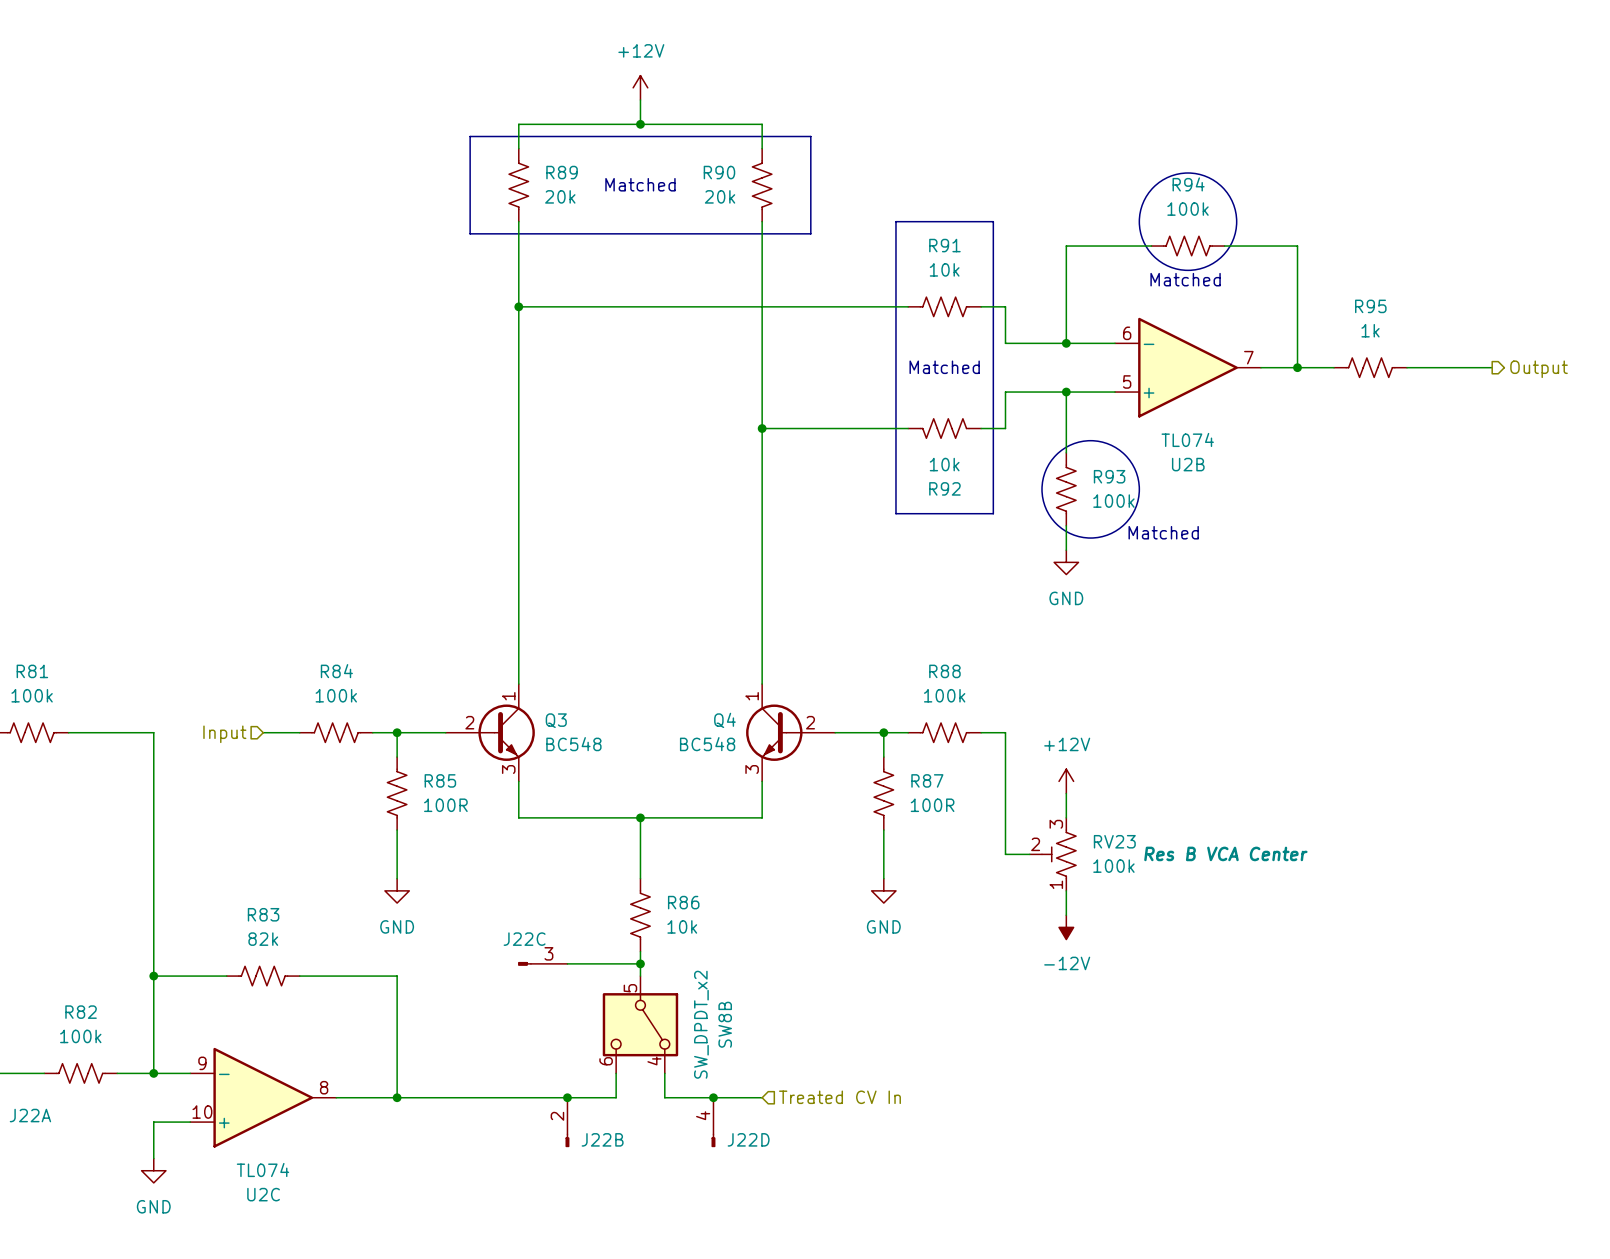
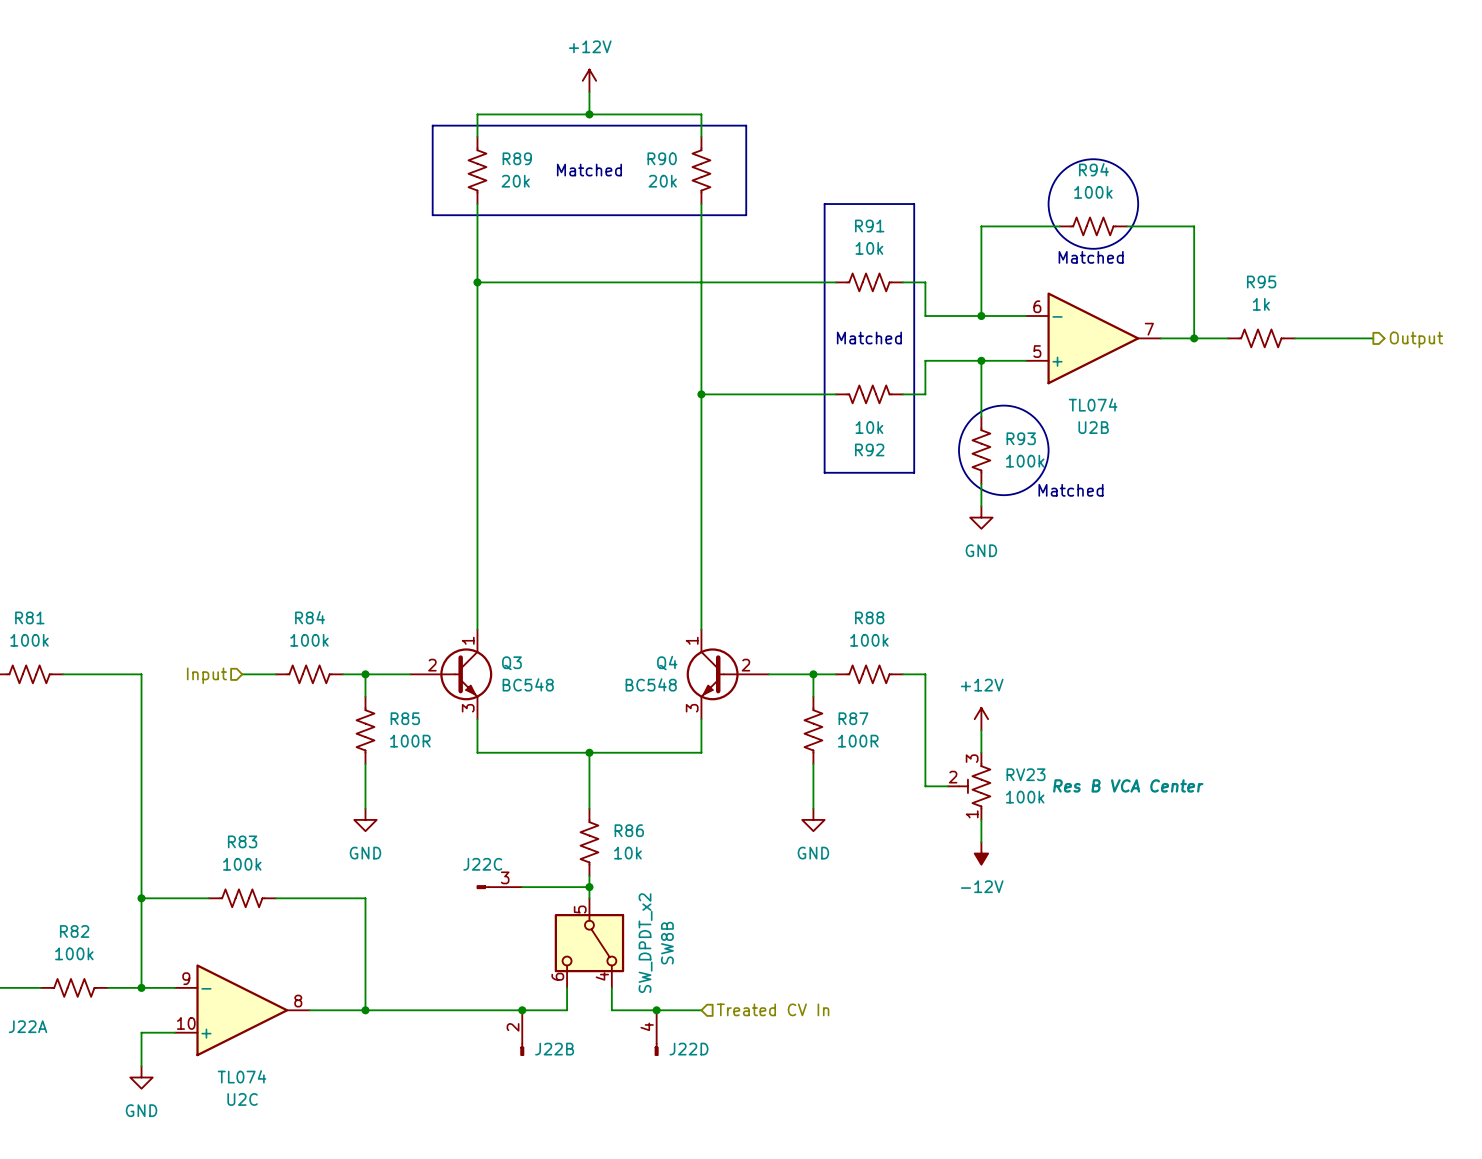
R83 value: 82k (263, 939) -> 100k (242, 864)

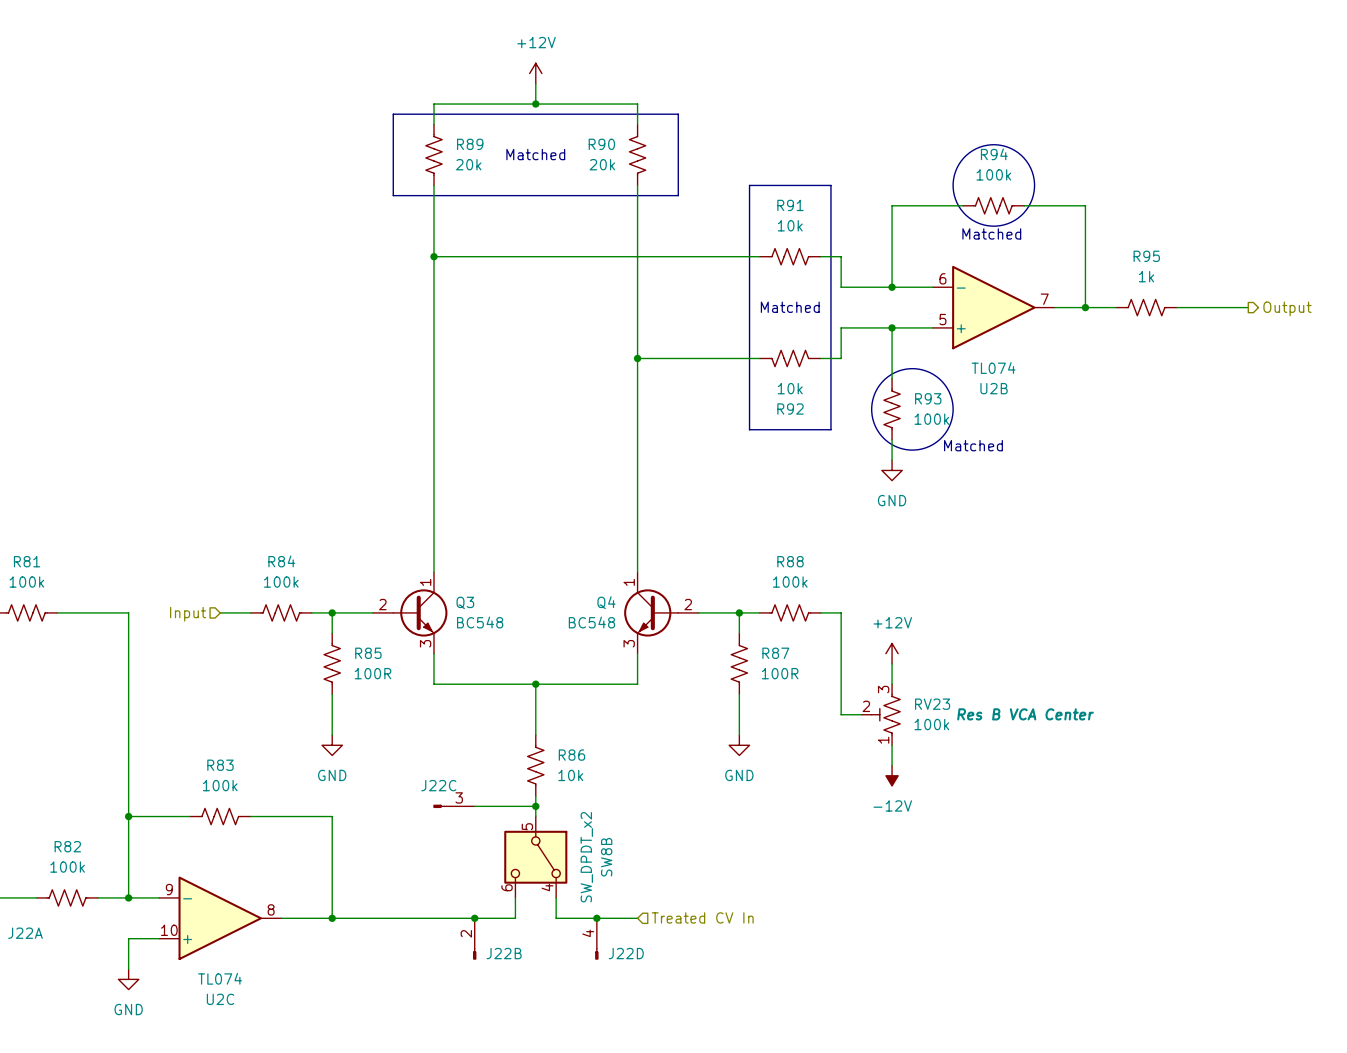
Q3 symbol: [410, 629, 493, 720] -> [372, 572, 448, 654]
Q4 symbol: [686, 629, 769, 720] -> [624, 572, 699, 654]

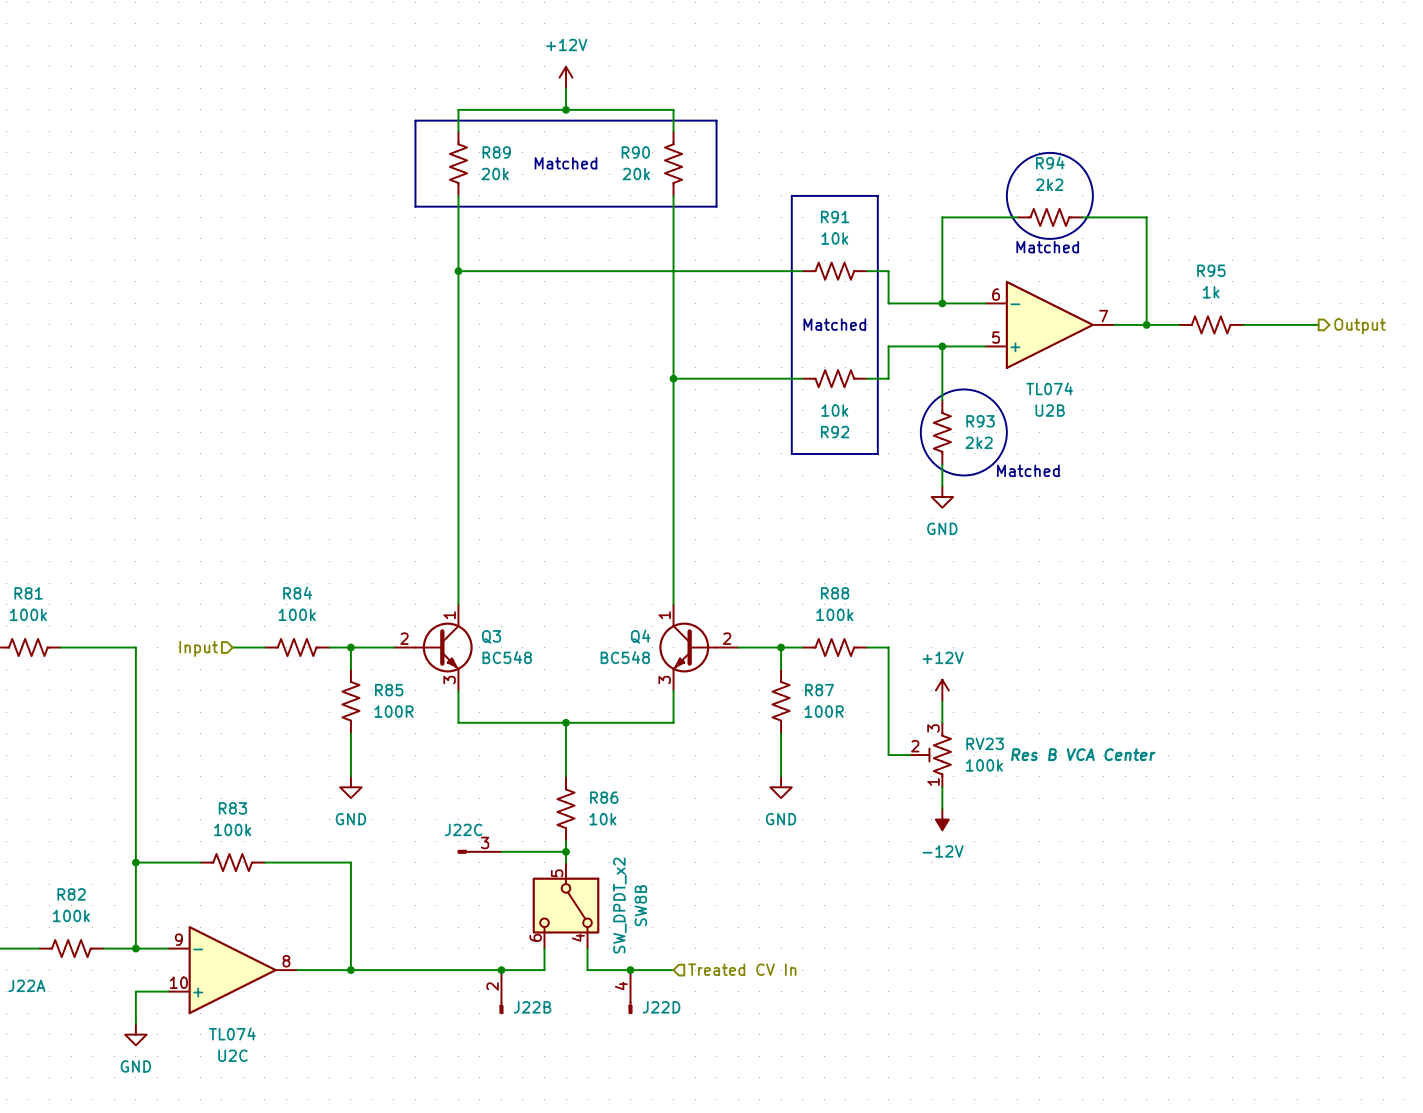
R94 value: 100k (993, 174) -> 2k2 (1049, 184)
R93 value: 100k (931, 419) -> 2k2 (979, 442)

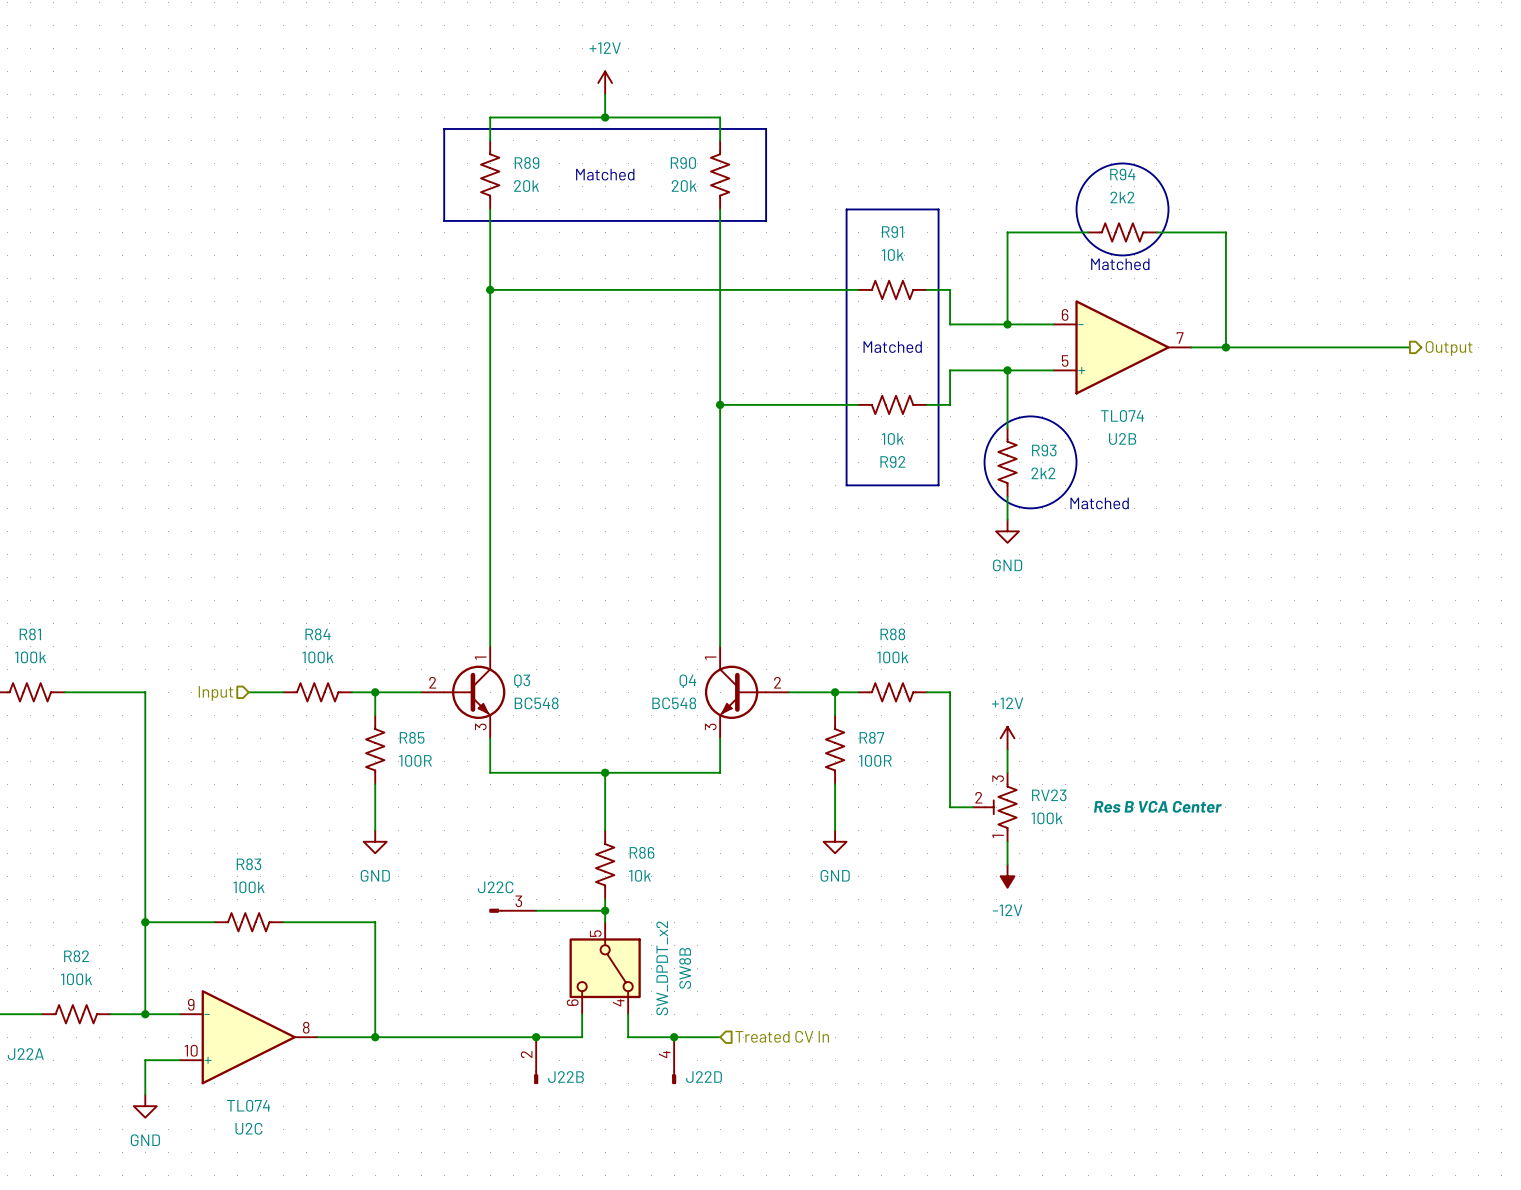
R95: 1k (1211, 324) -> none

